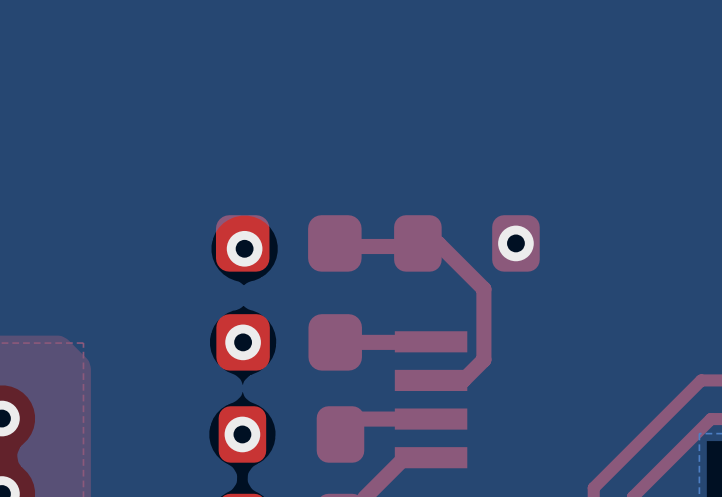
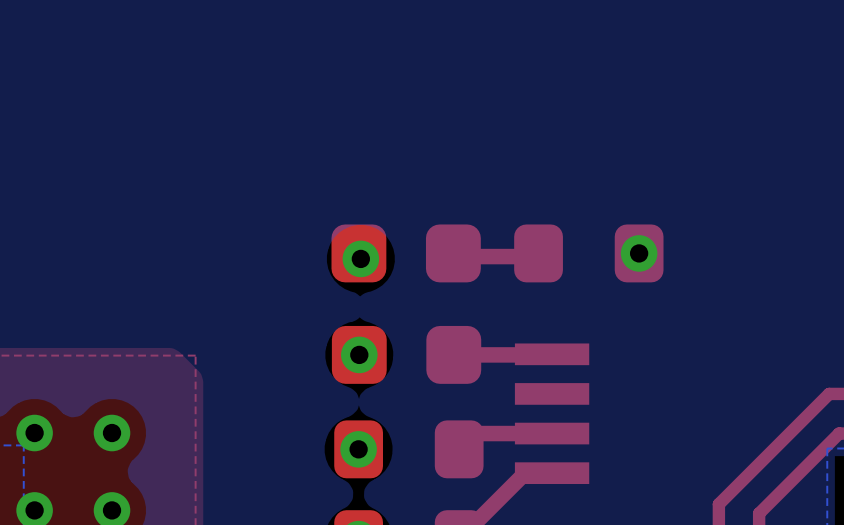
top track: (417, 243) (438, 243) (483, 289) (483, 359) (463, 380) (431, 380) -> none

